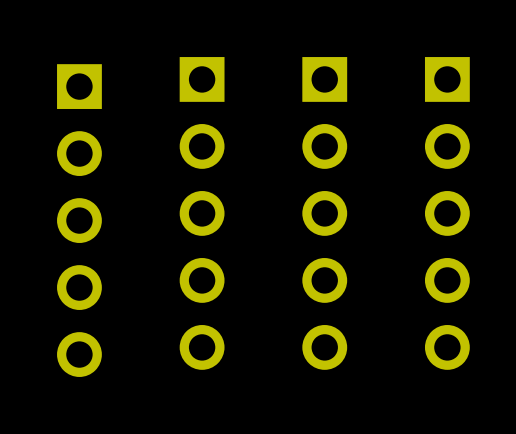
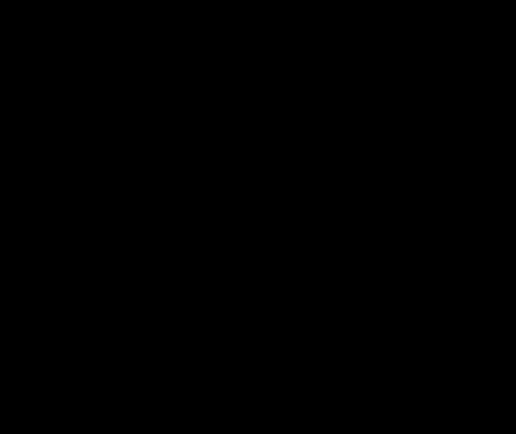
part: (202, 213) -> none
part: (324, 213) -> none
part: (447, 213) -> none
part: (79, 220) -> none

